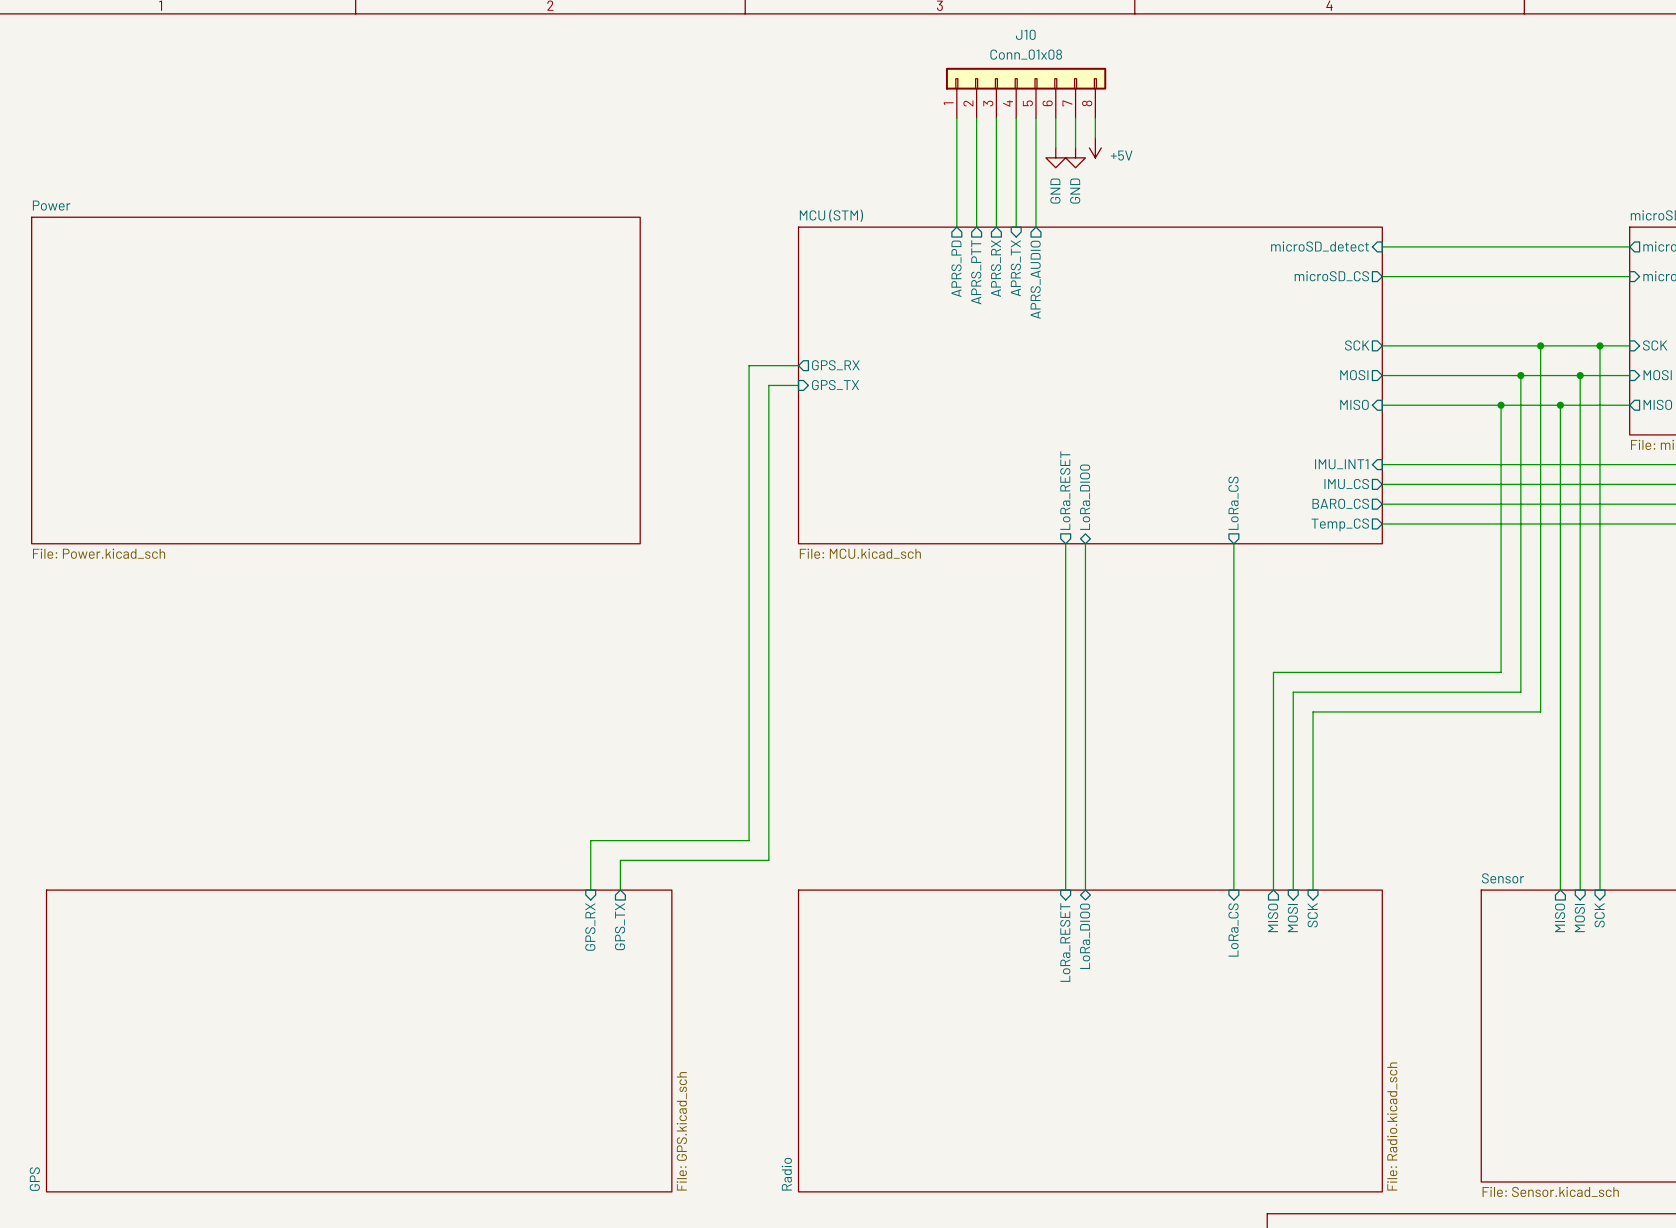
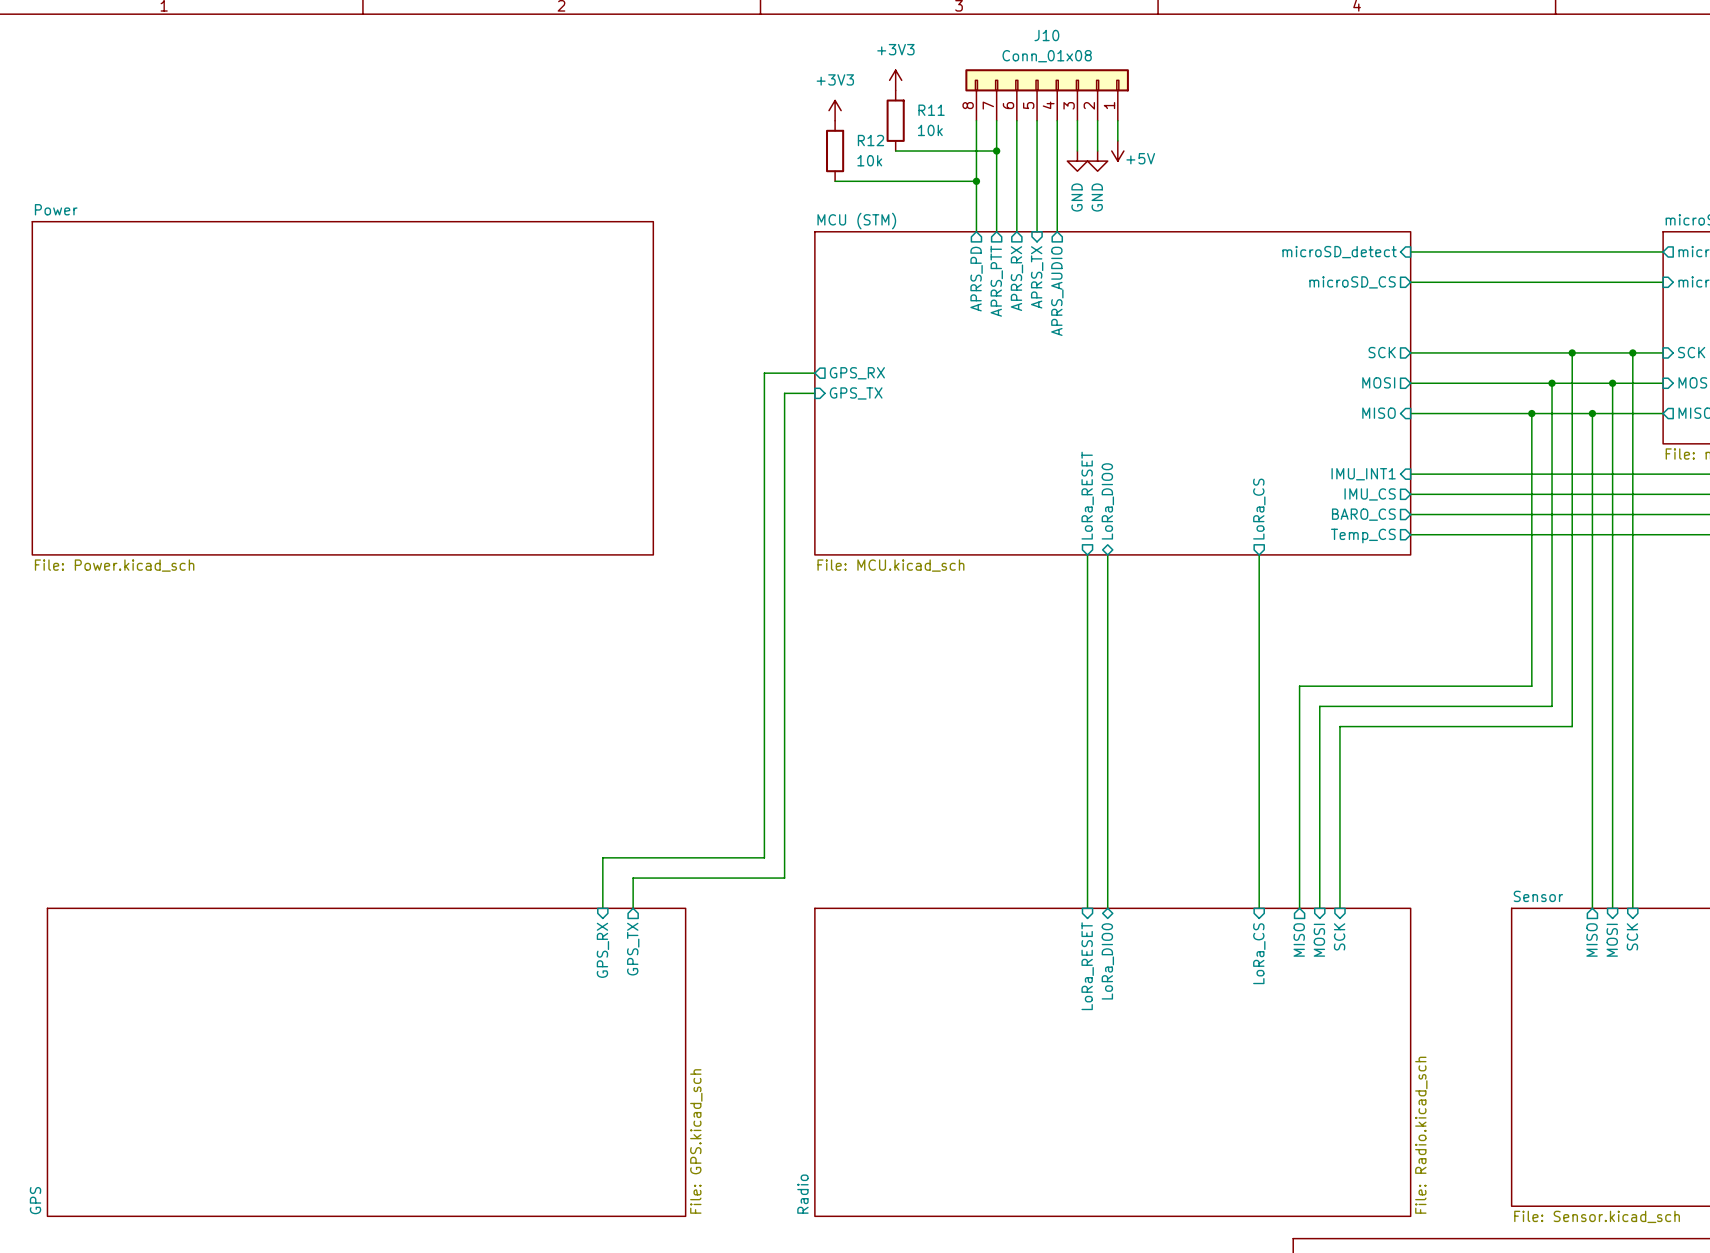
power symbol: none -> +3V3 (895, 80)
J10 flip: as is (1026, 78) -> left-right (1047, 80)
power symbol: none -> +3V3 (835, 110)
R11: none -> 10k (895, 120)
R12: none -> 10k (835, 151)
wire: none -> (895, 151) (996, 151)
junction: none -> (996, 151)
wire: none -> (835, 181) (976, 181)
junction: none -> (976, 181)

